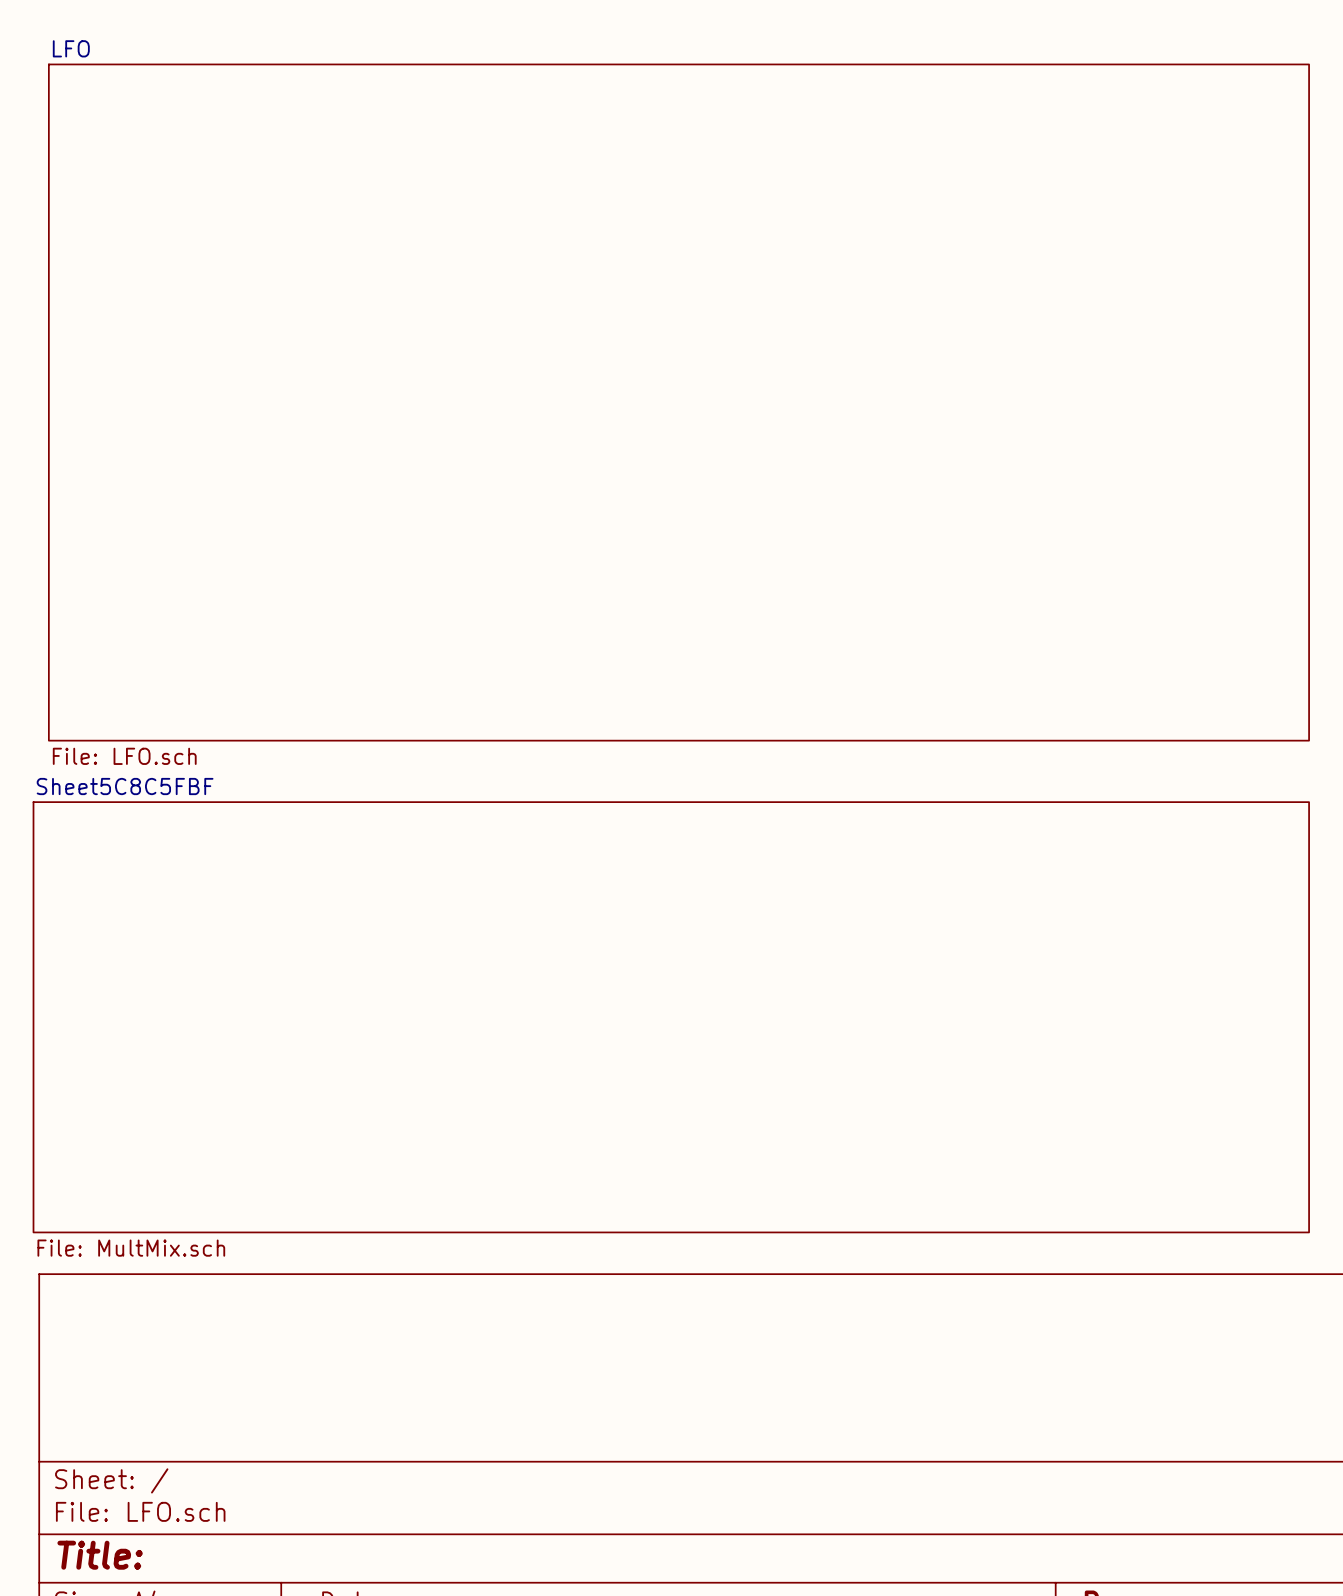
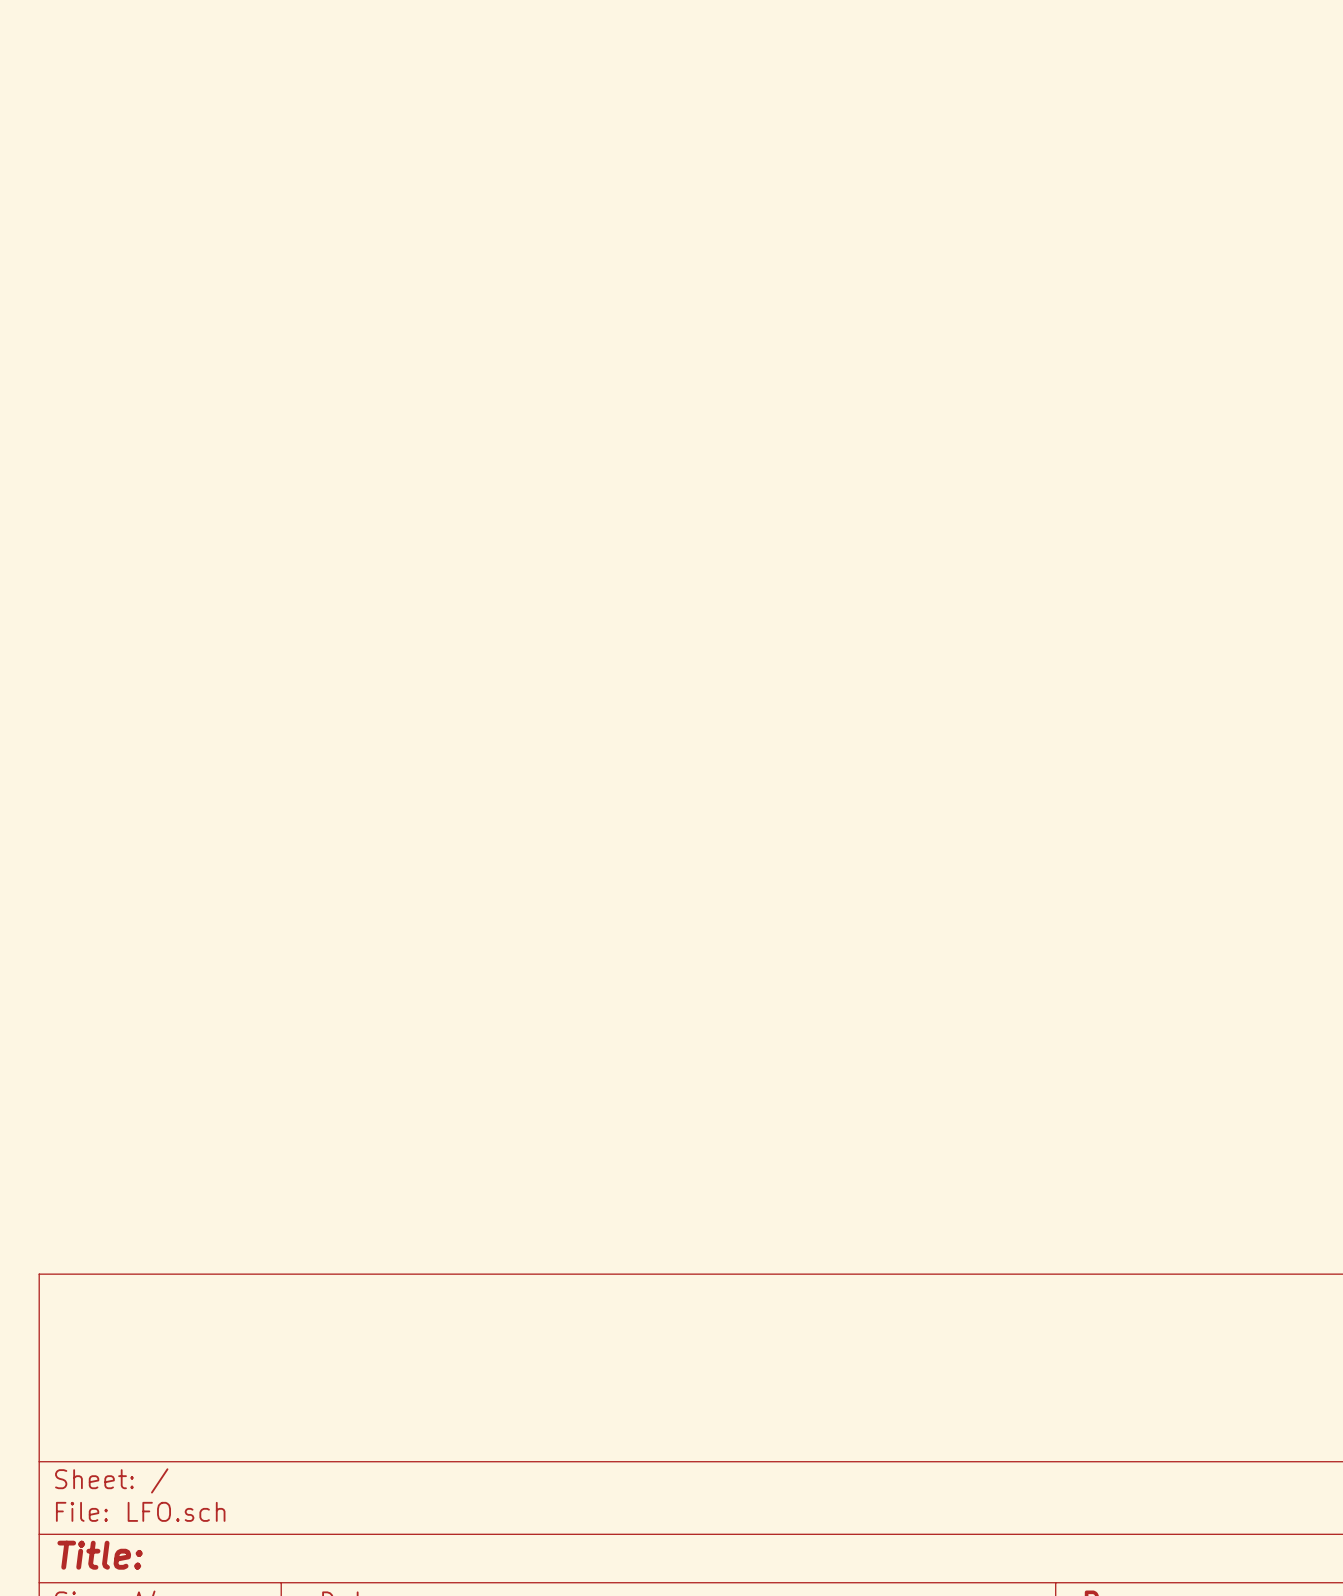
sheet LFO: File: LFO.sch (678, 402) -> none
sheet Sheet5C8C5FBF: File: MultMix.sch (671, 1017) -> none

